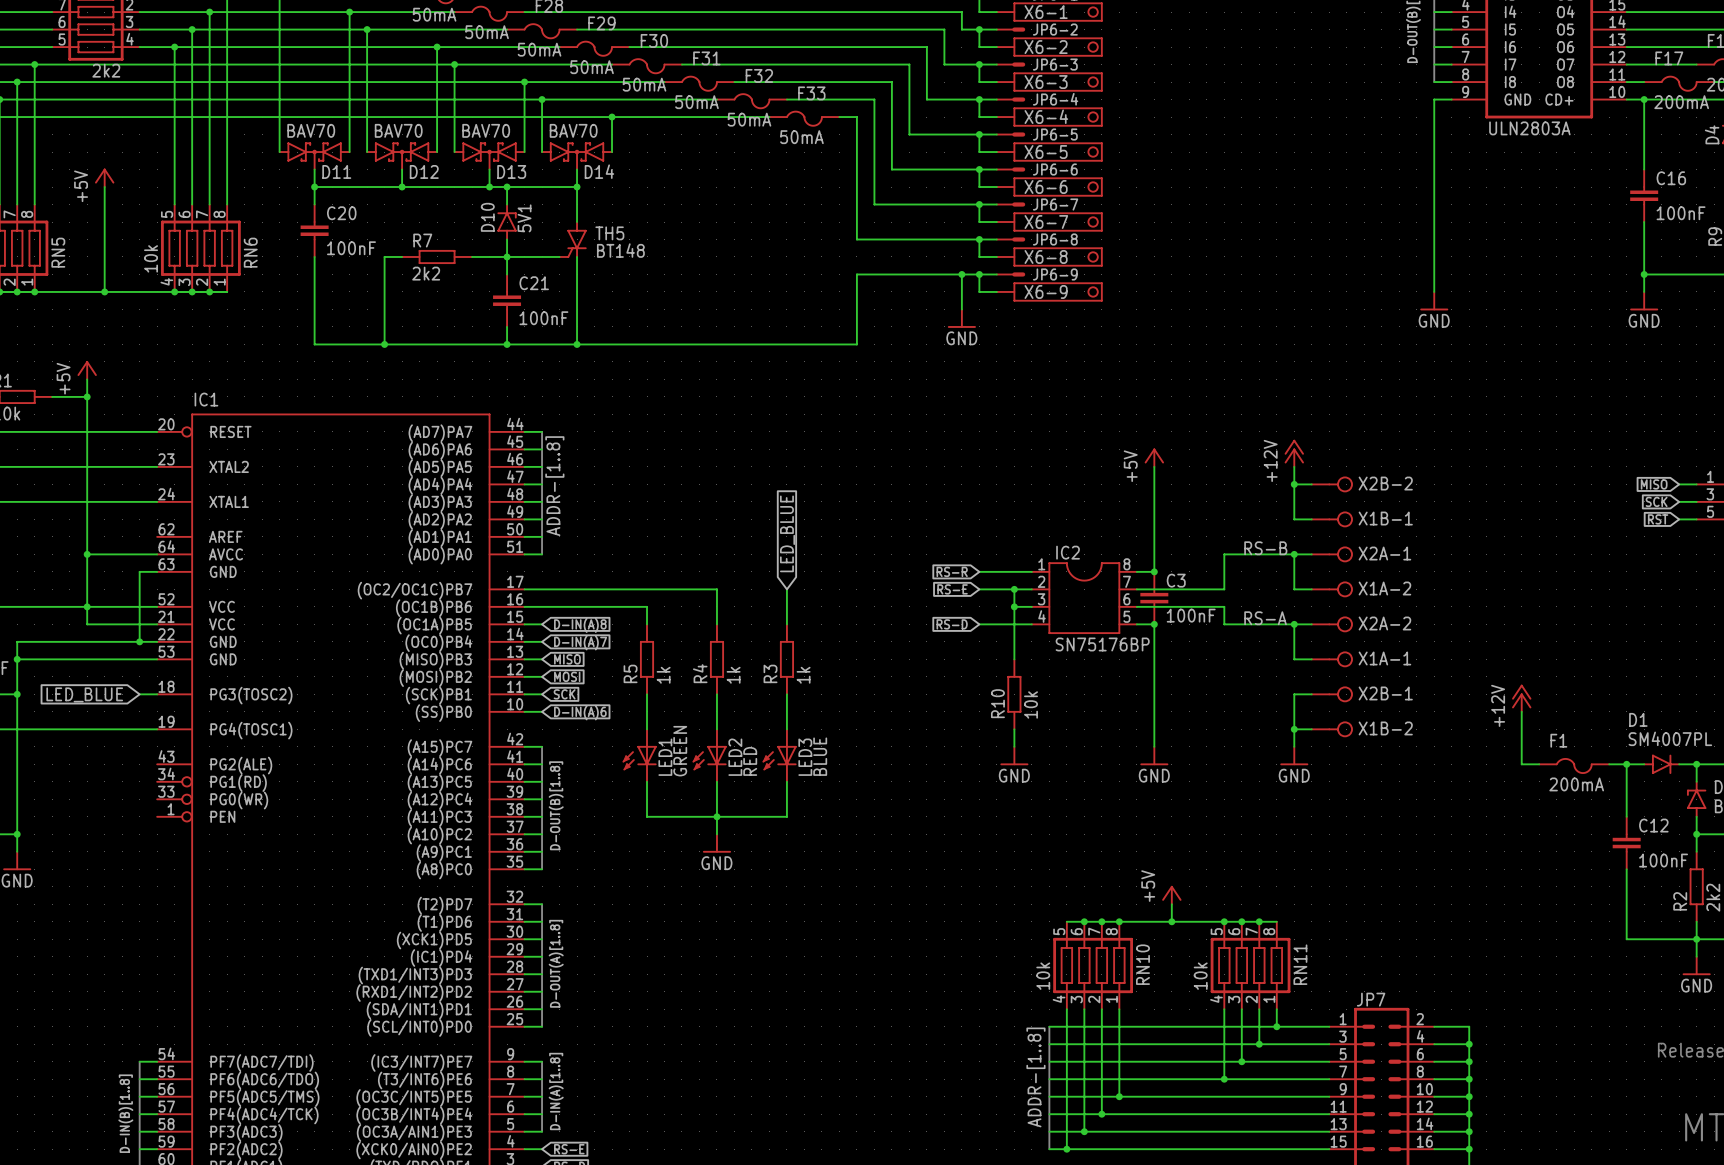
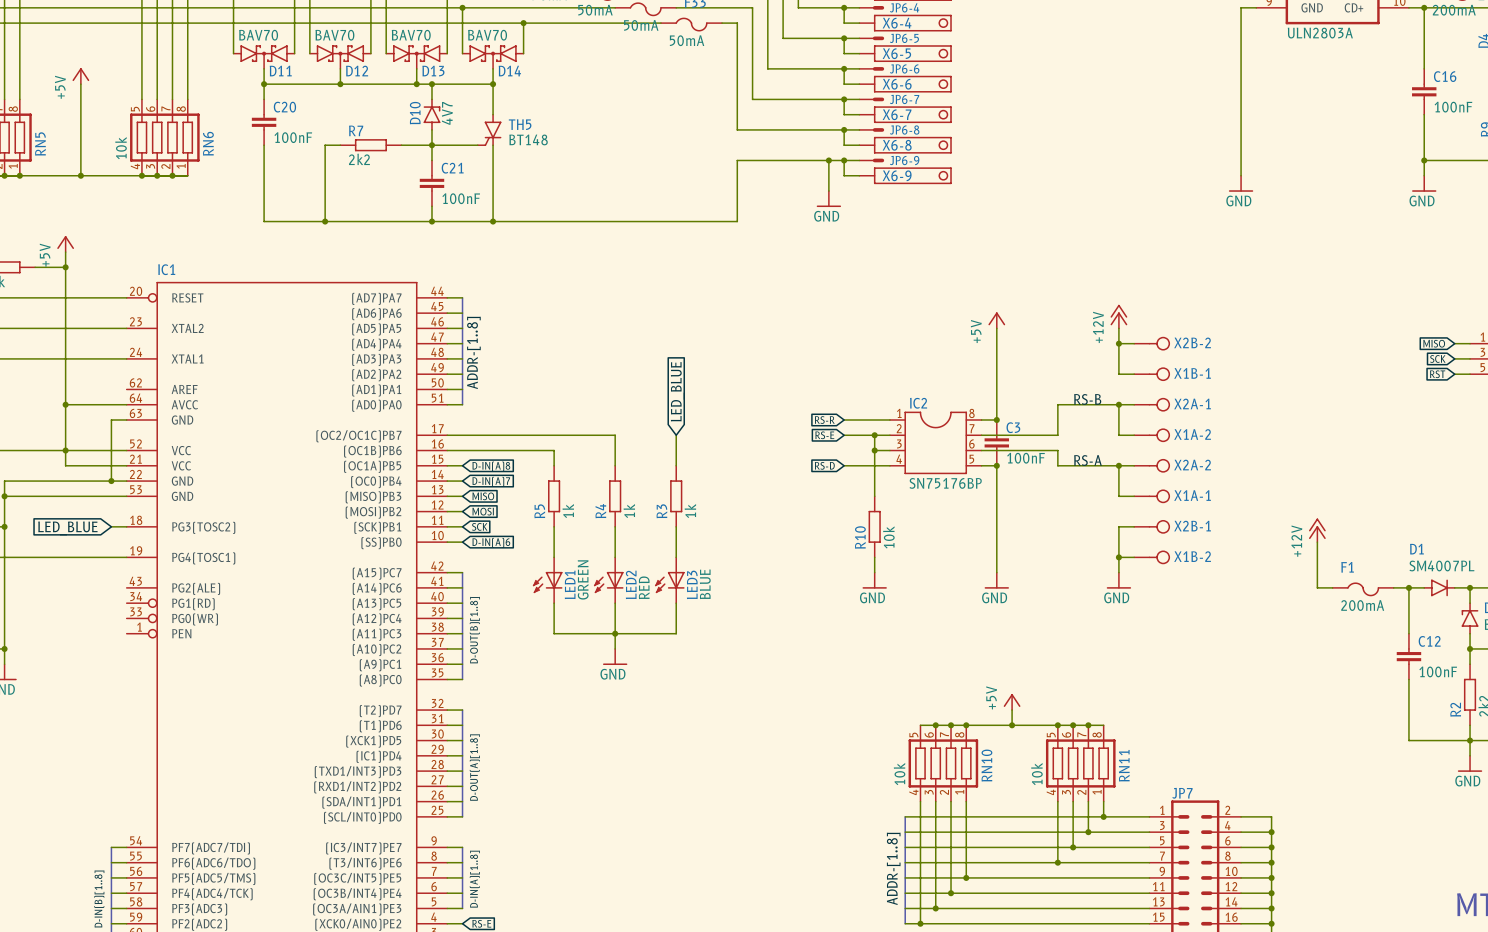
D10 value: 5V1 (524, 218) -> 4V7 (447, 113)

